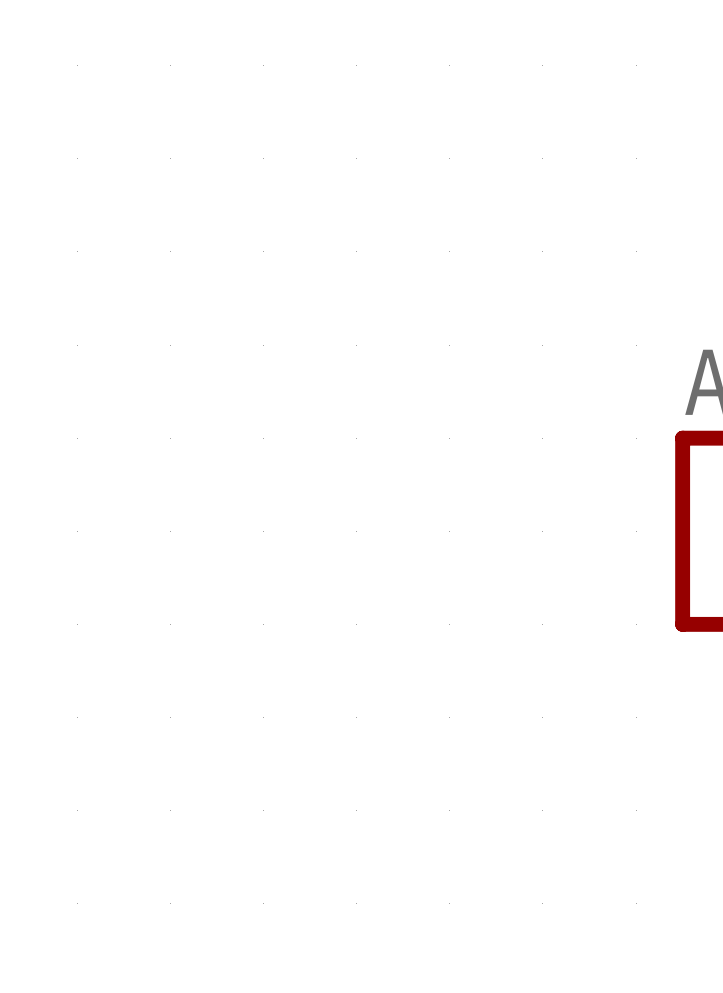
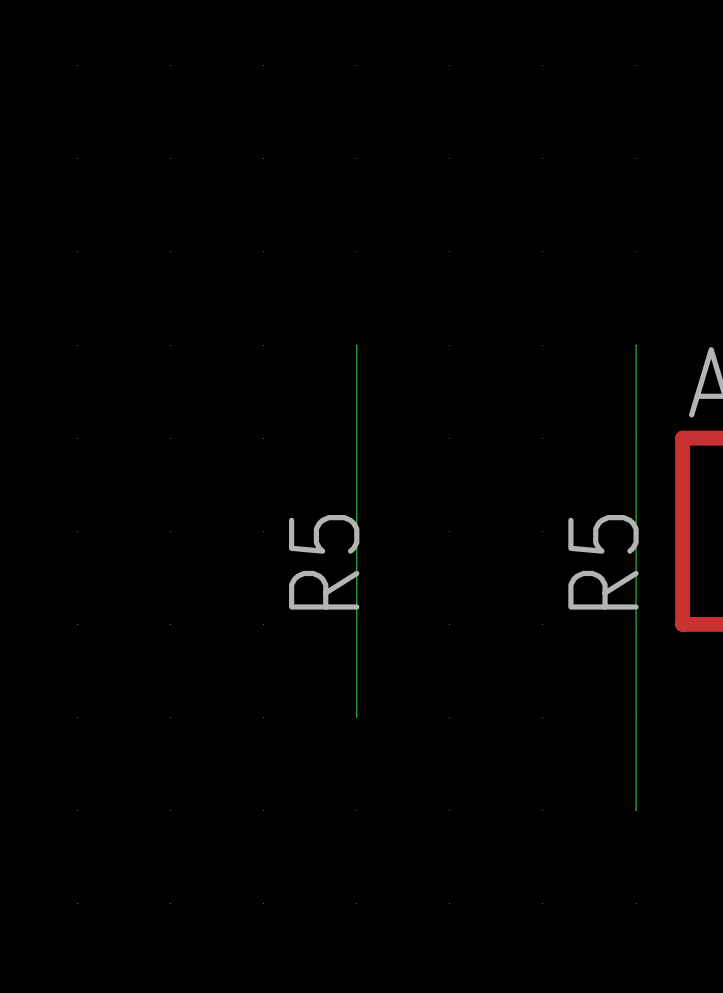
wire: none -> (356, 345) (356, 717)
wire: none -> (636, 345) (636, 810)
label: none -> R5 (324, 562)
label: none -> R5 (603, 562)

